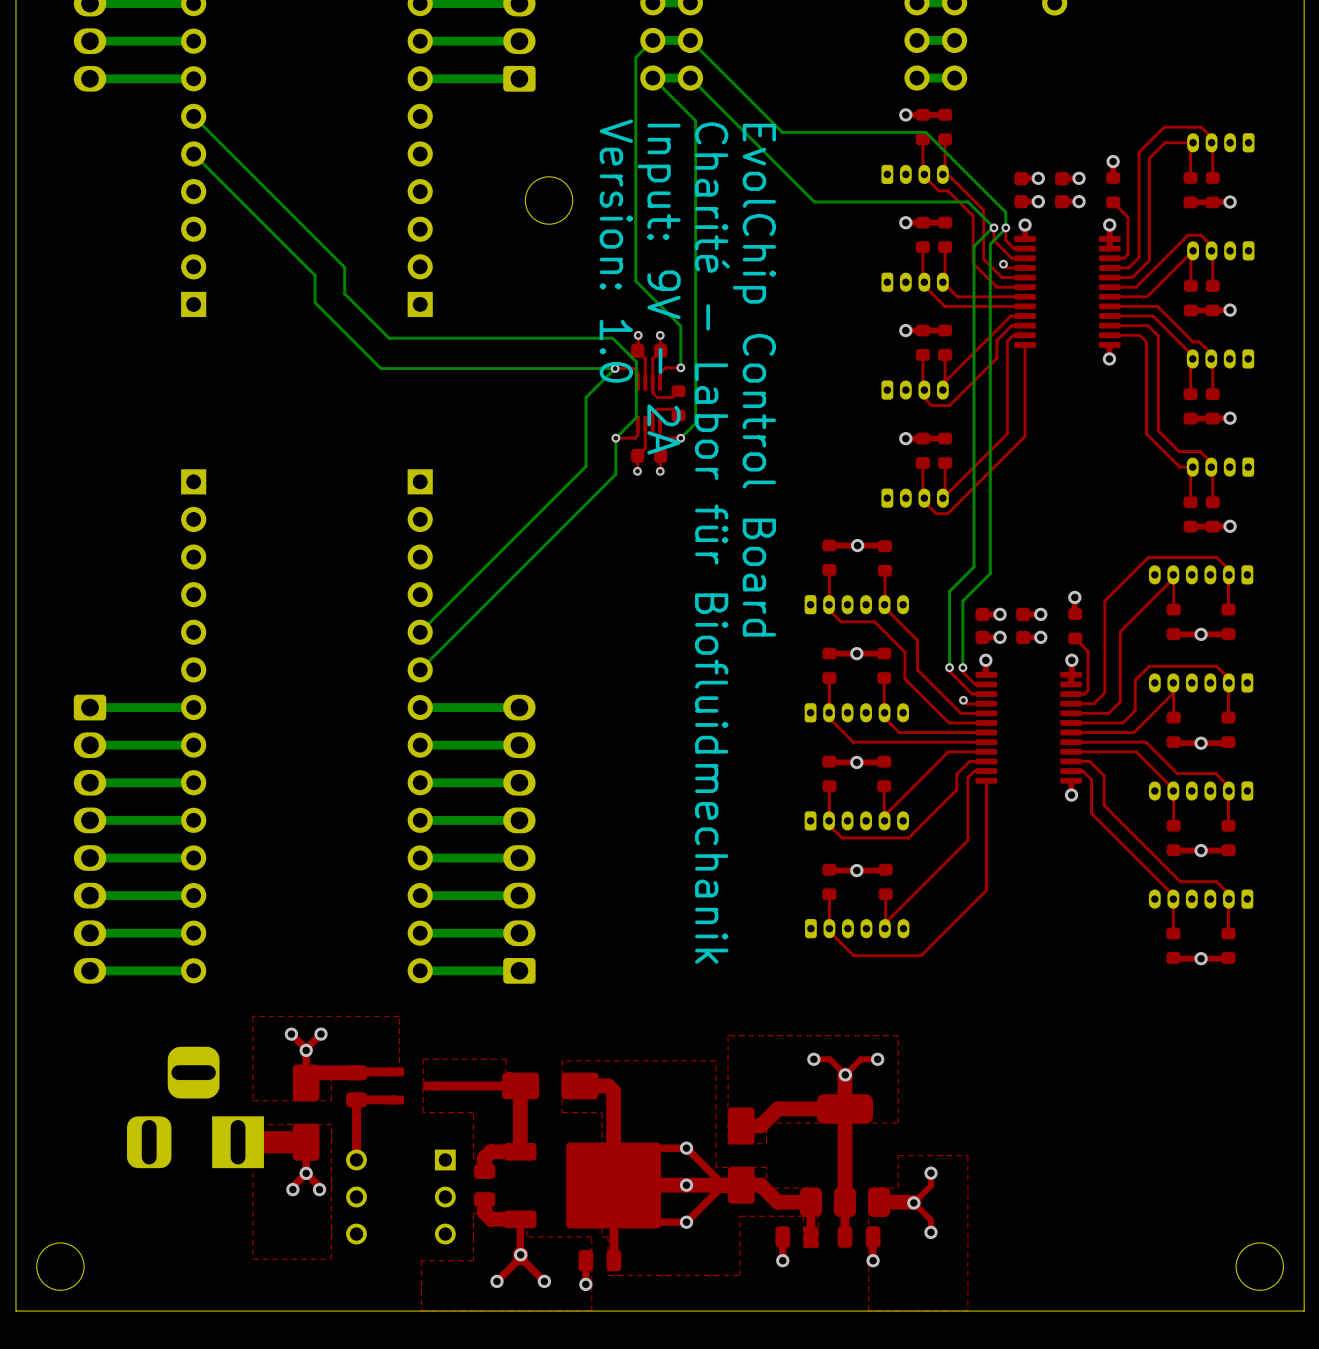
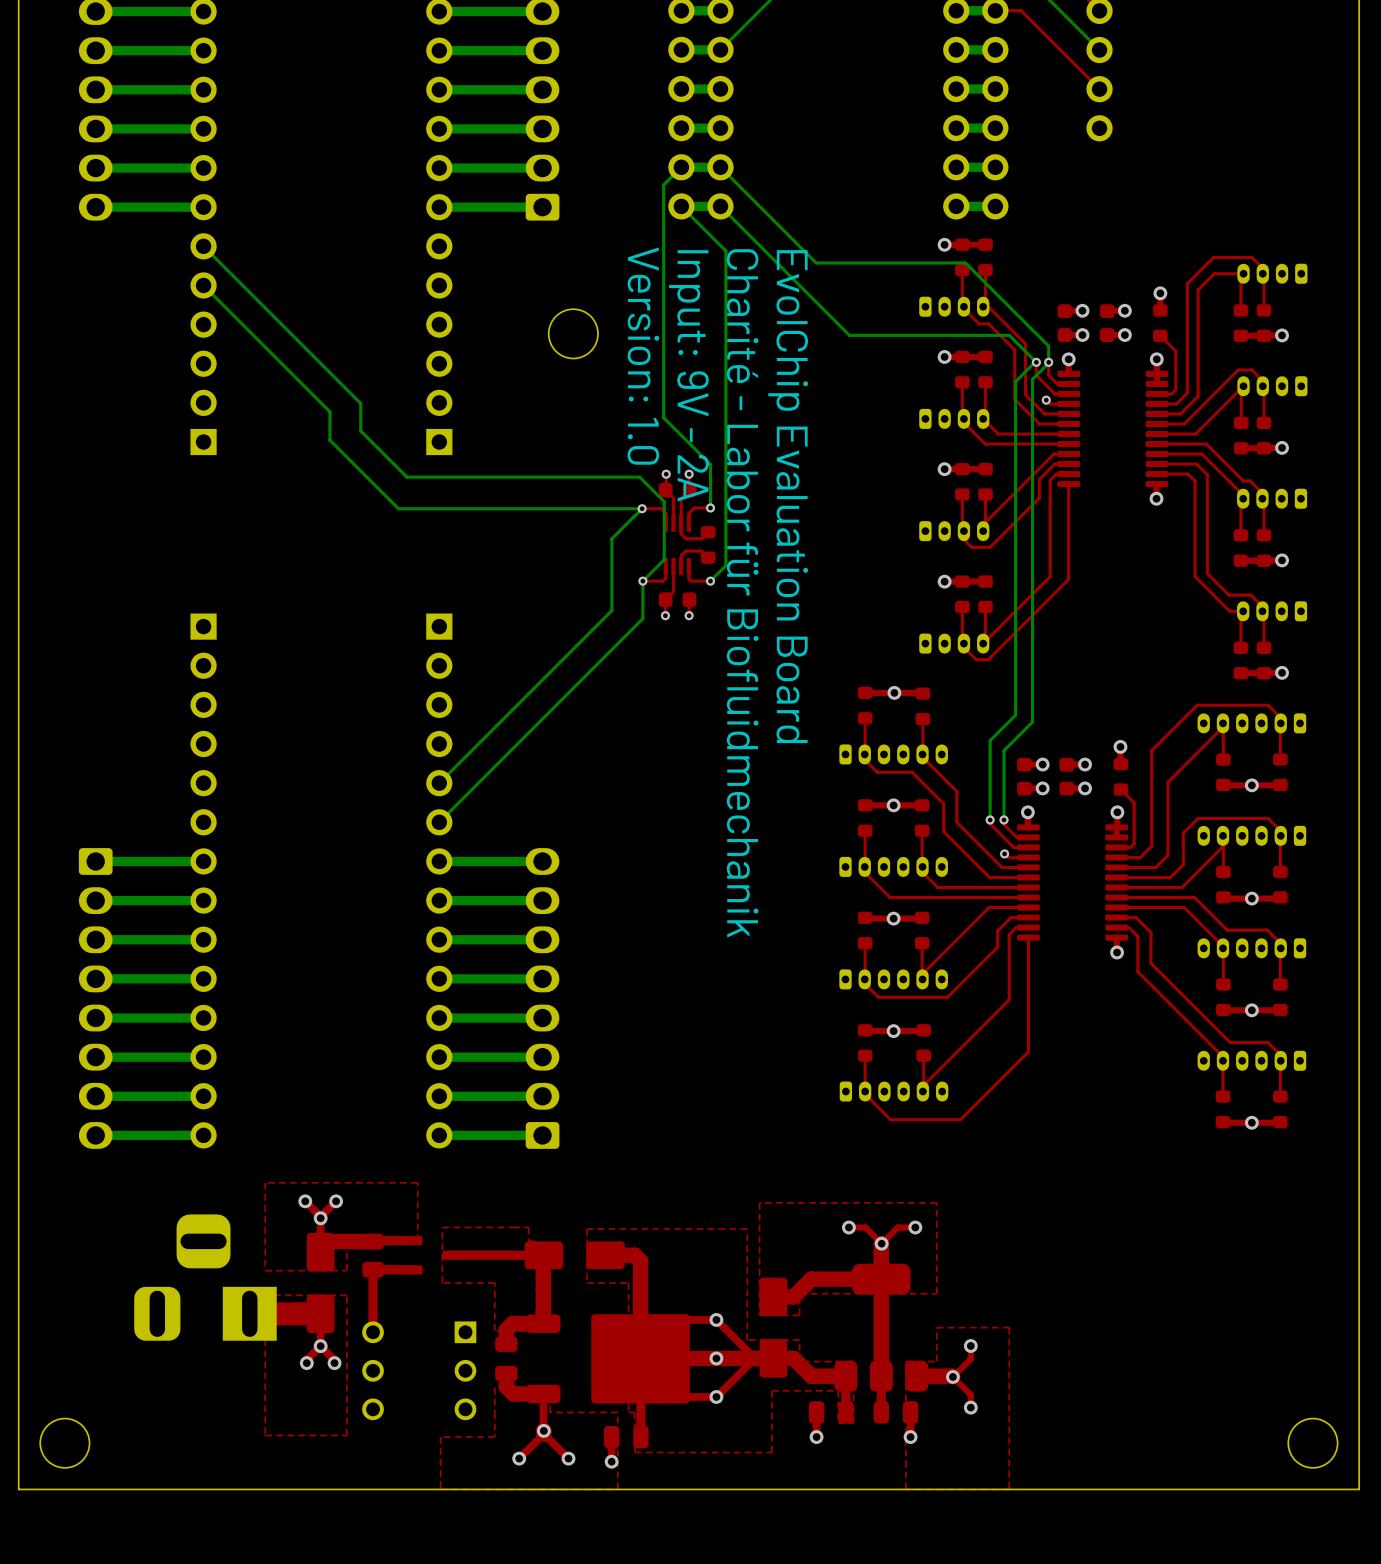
text: EvolChip Control Board (754, 380) -> EvolChip Evaluation Board (788, 496)

